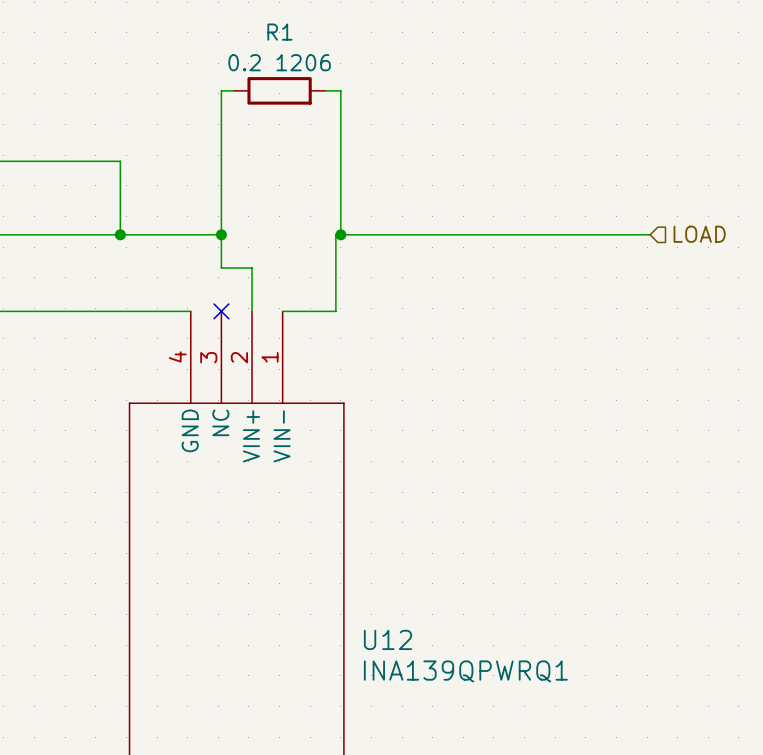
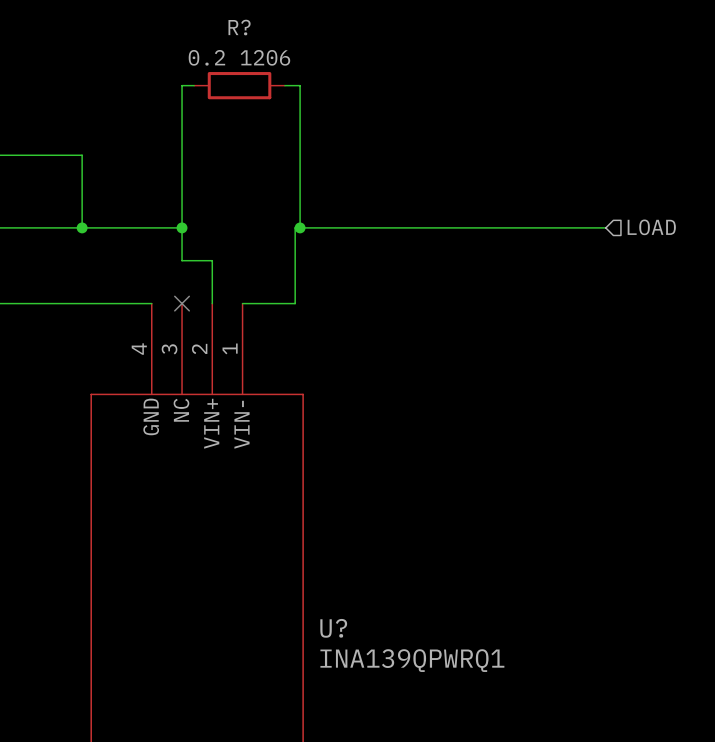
R1 name: R1 (279, 32) -> R? (239, 27)
U12 name: U12 (387, 639) -> U? (333, 628)

